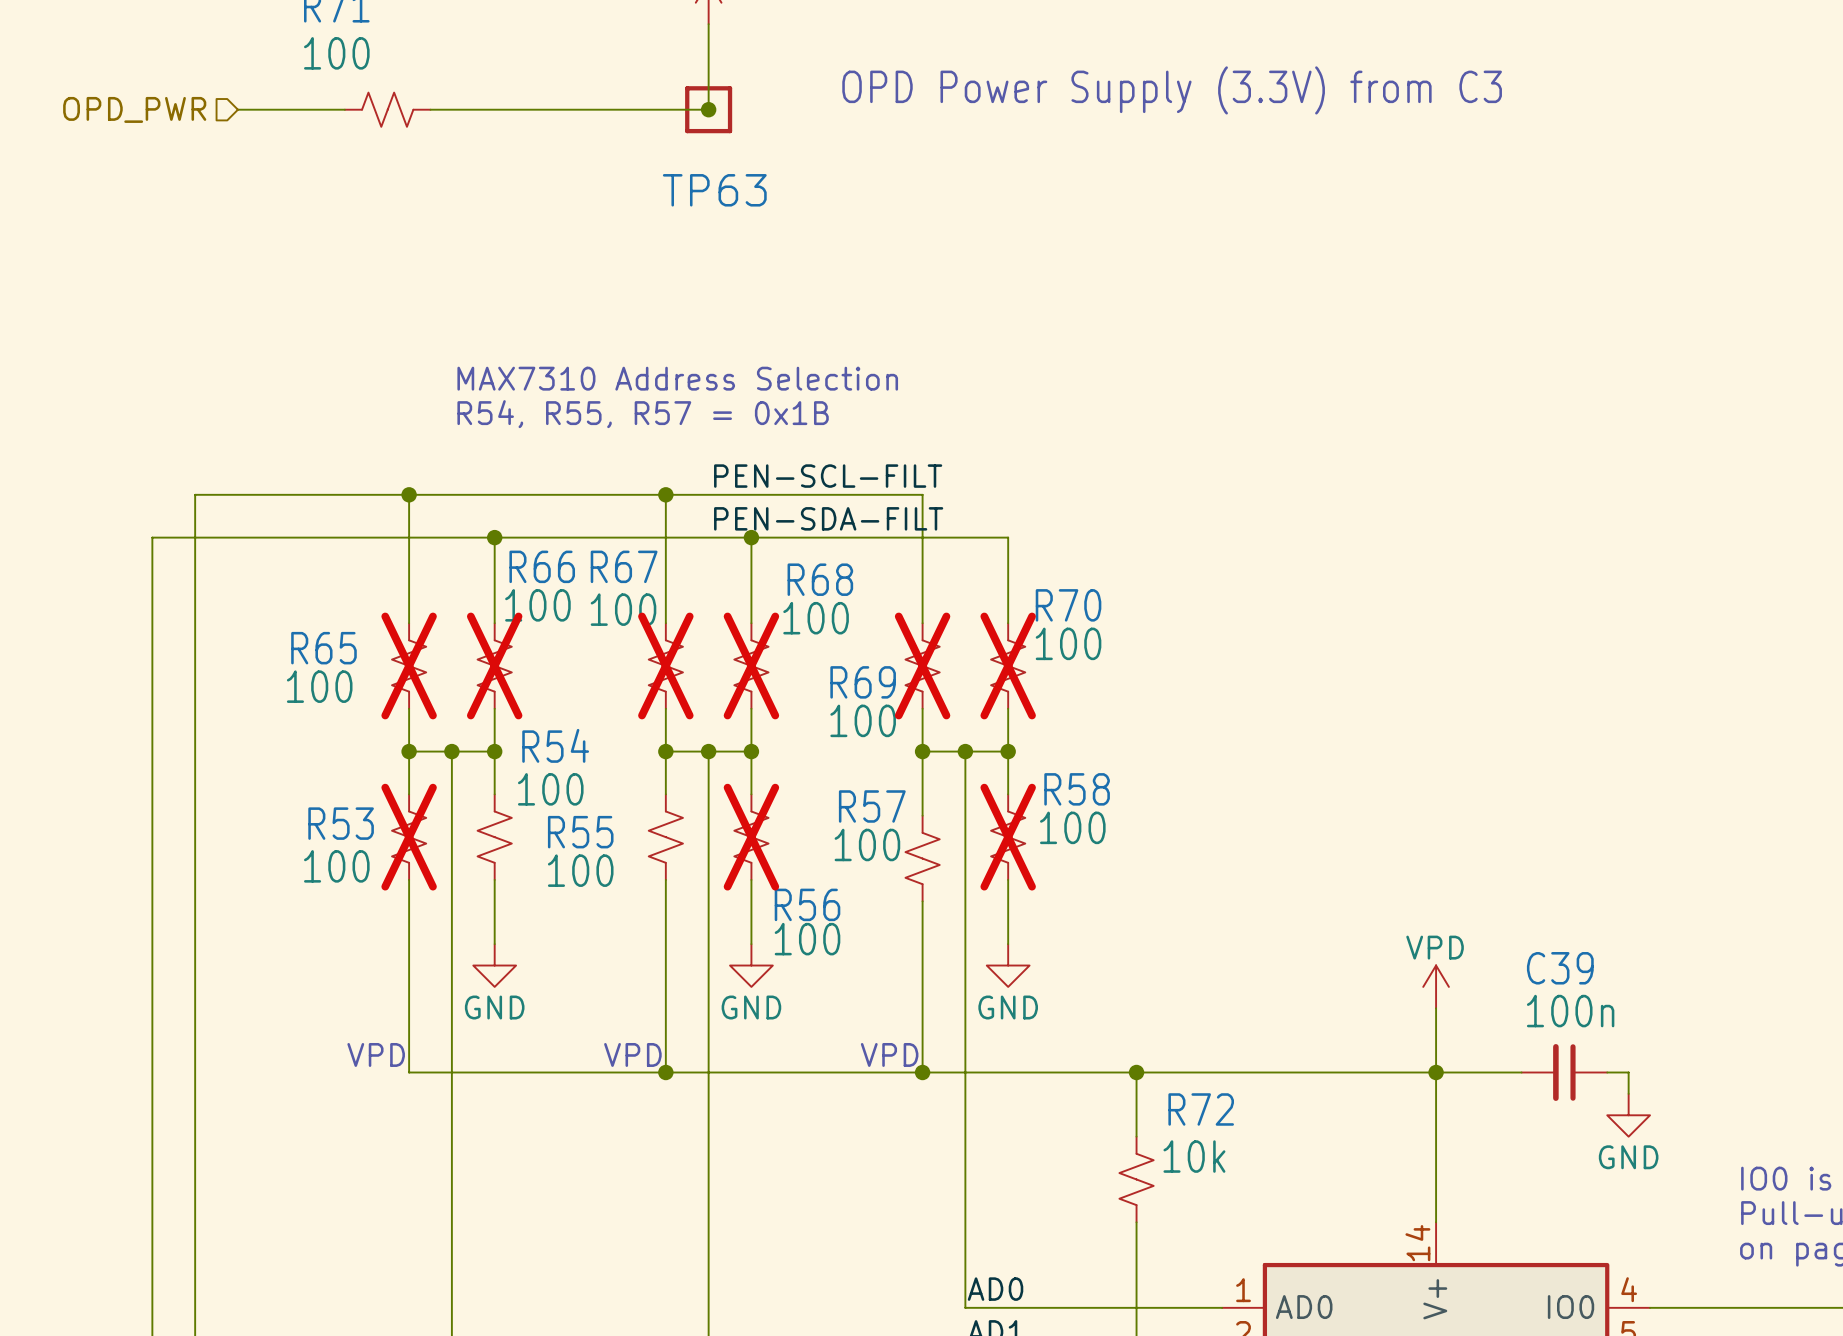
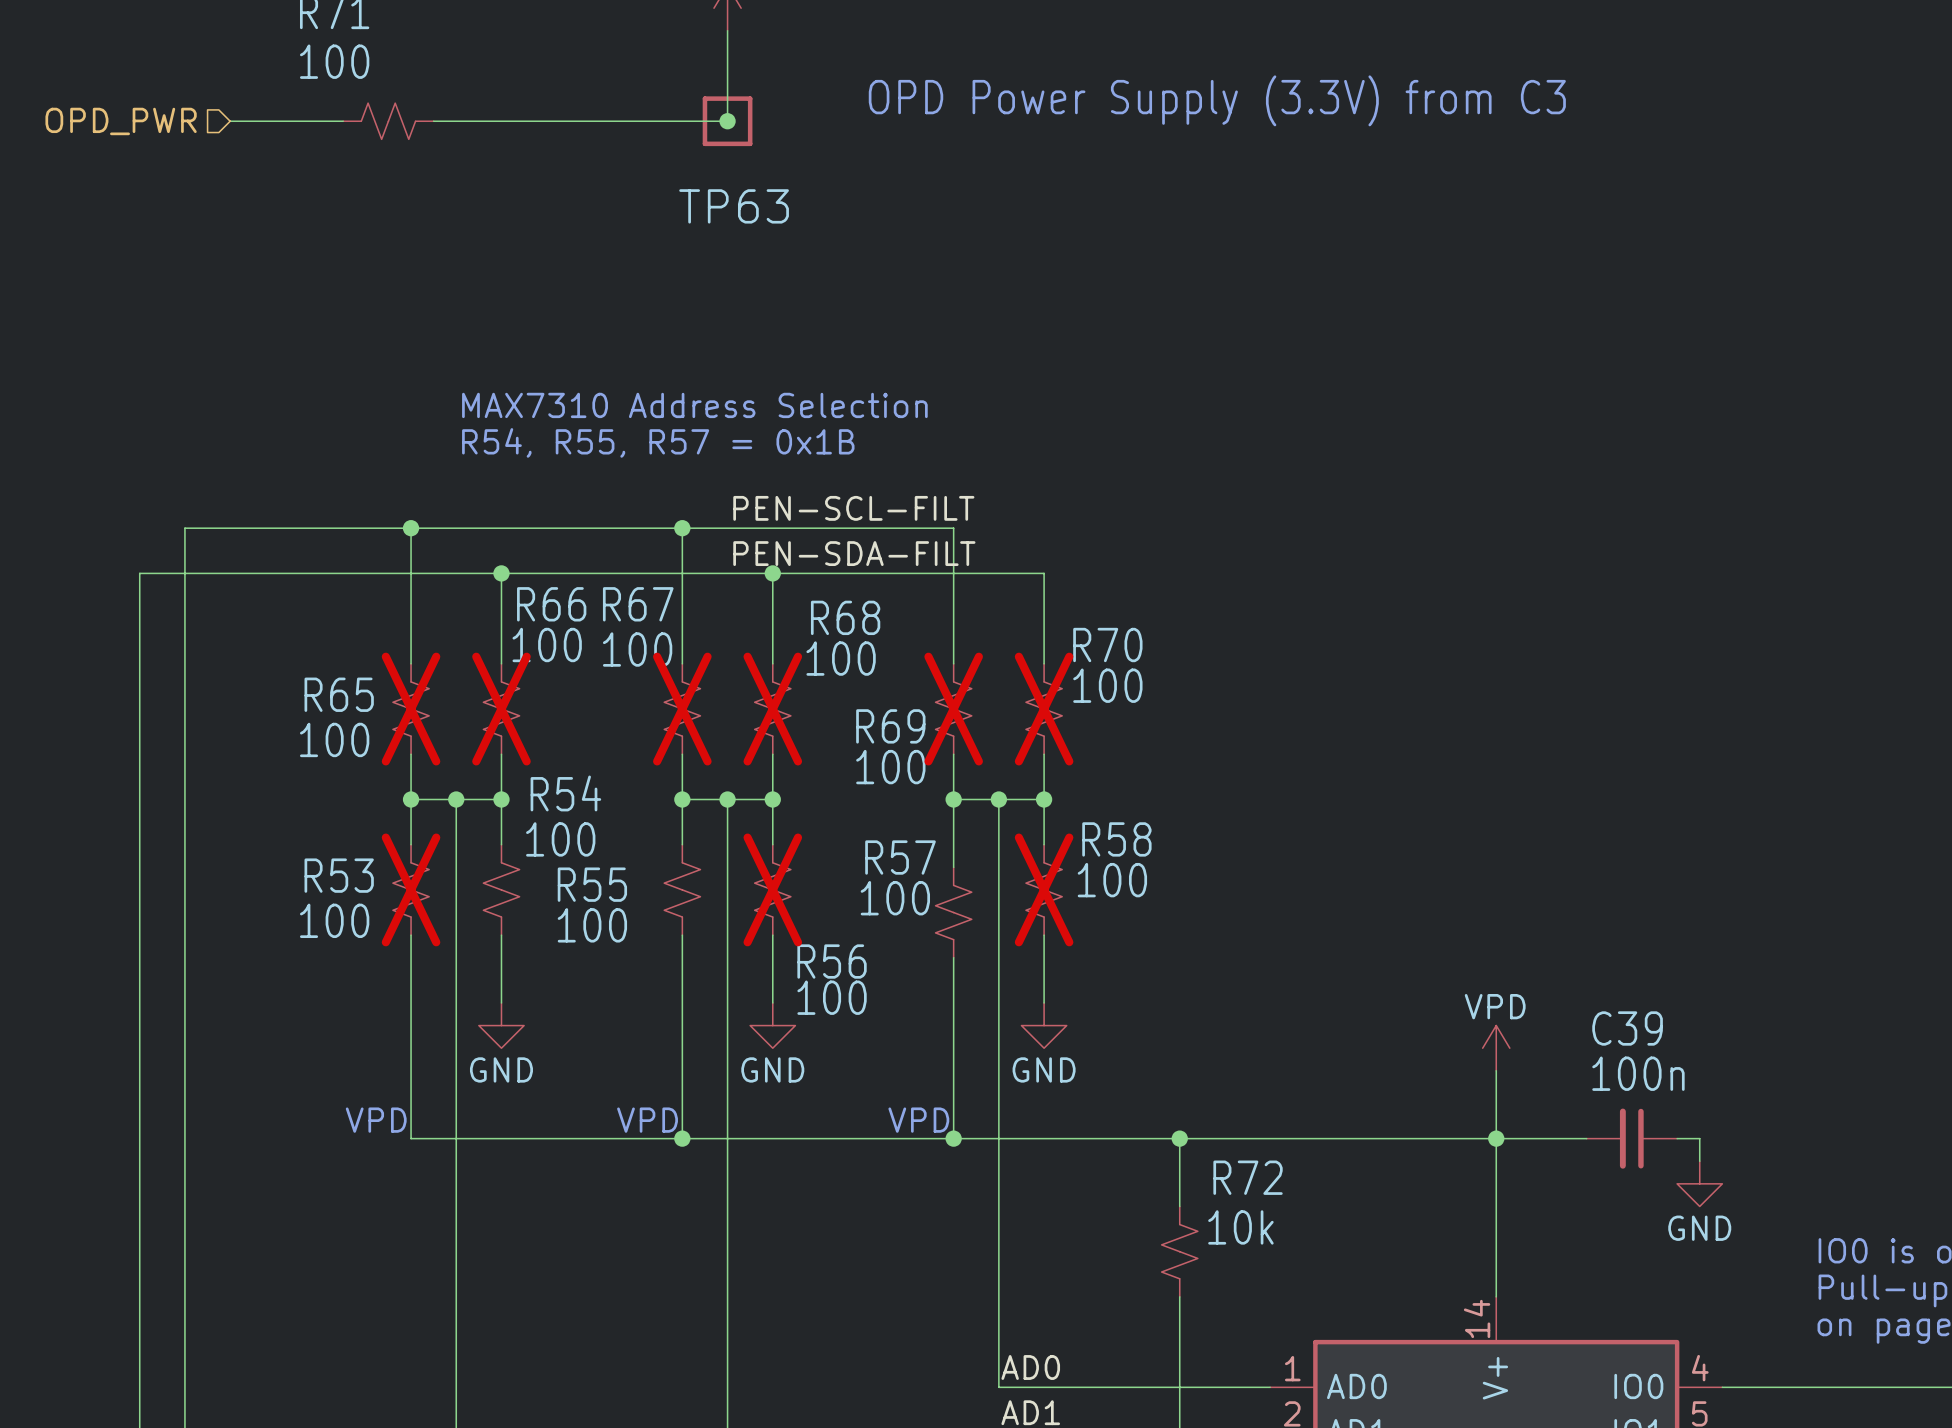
R65 name position: R65 (323, 648) -> R65 (339, 694)
R65 value position: 100 (319, 686) -> 100 (334, 739)

